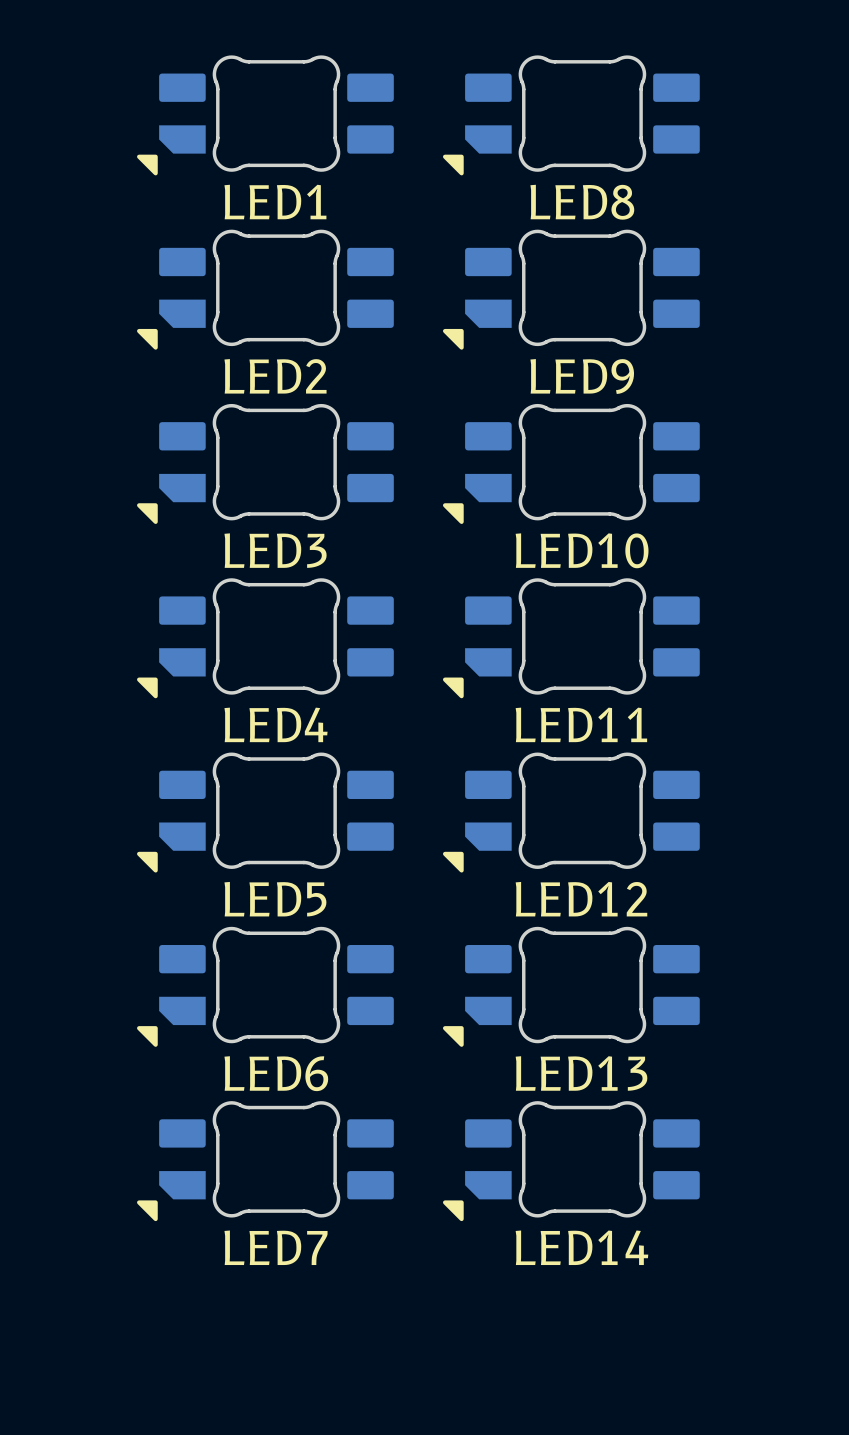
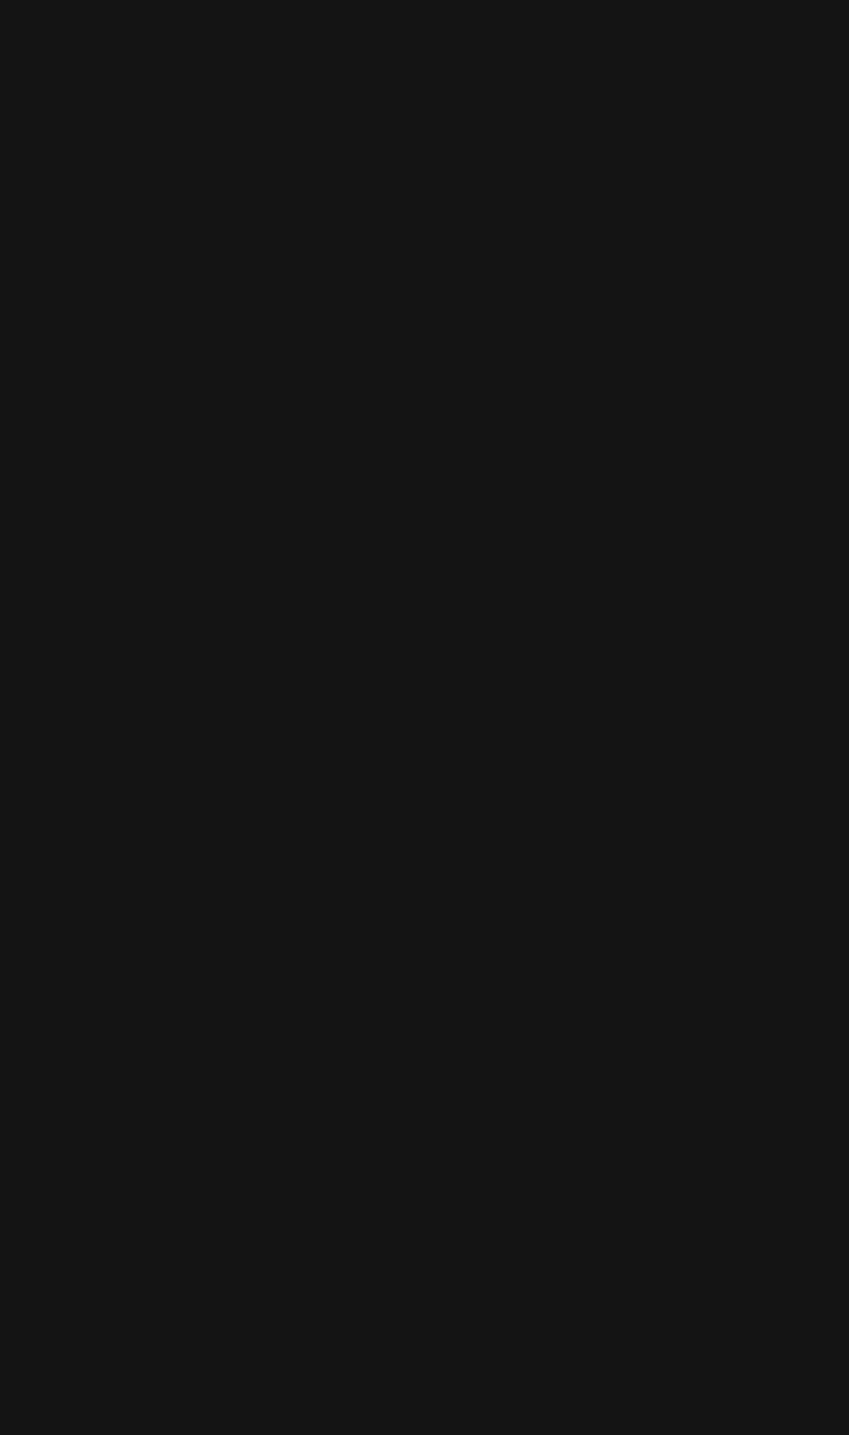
LED1: (265, 115) -> none
LED8: (571, 115) -> none
LED2: (265, 289) -> none
LED9: (571, 289) -> none
LED3: (265, 463) -> none
LED10: (571, 463) -> none
LED4: (265, 638) -> none
LED11: (571, 638) -> none
LED5: (265, 812) -> none
LED12: (571, 812) -> none
LED6: (265, 986) -> none
LED13: (571, 986) -> none
LED7: (265, 1161) -> none
LED14: (571, 1161) -> none

